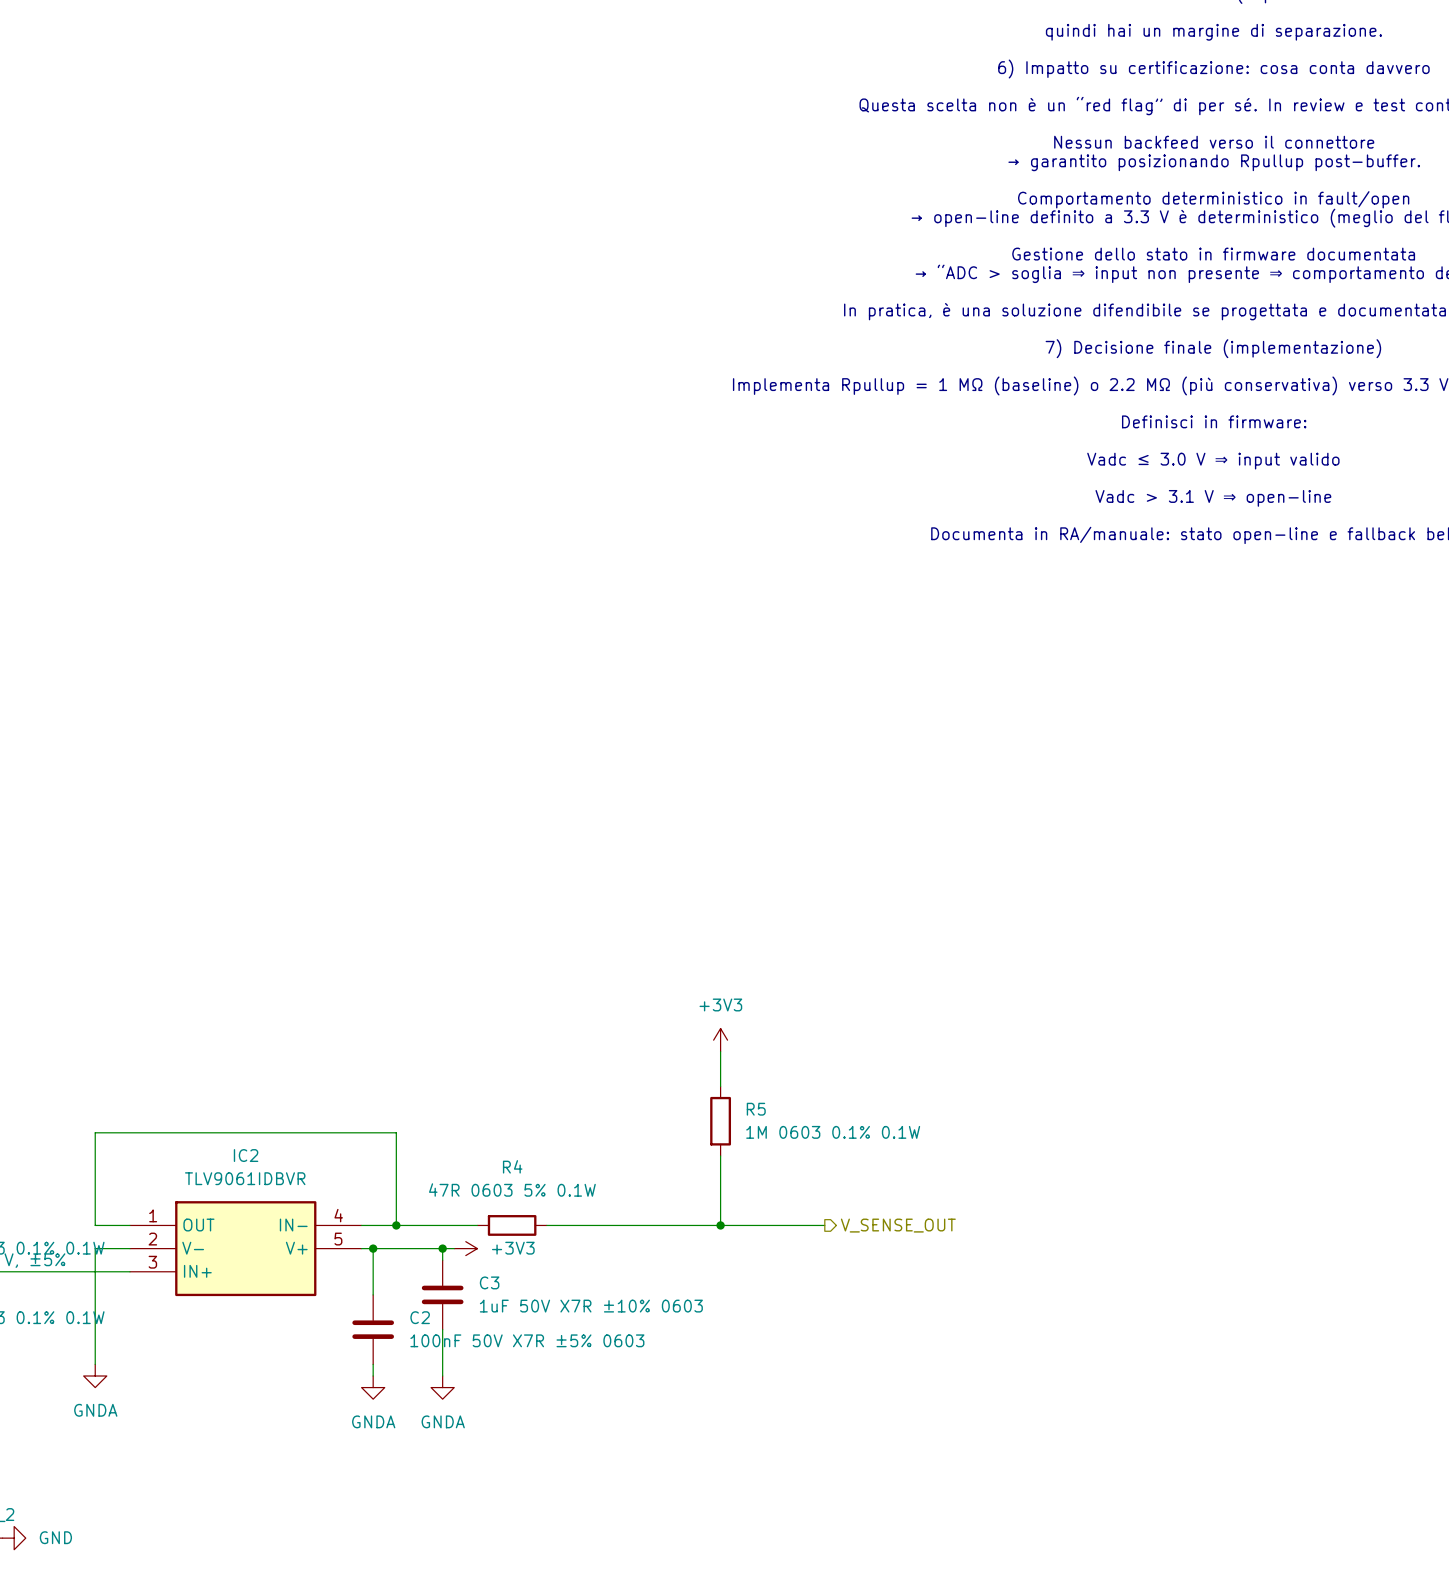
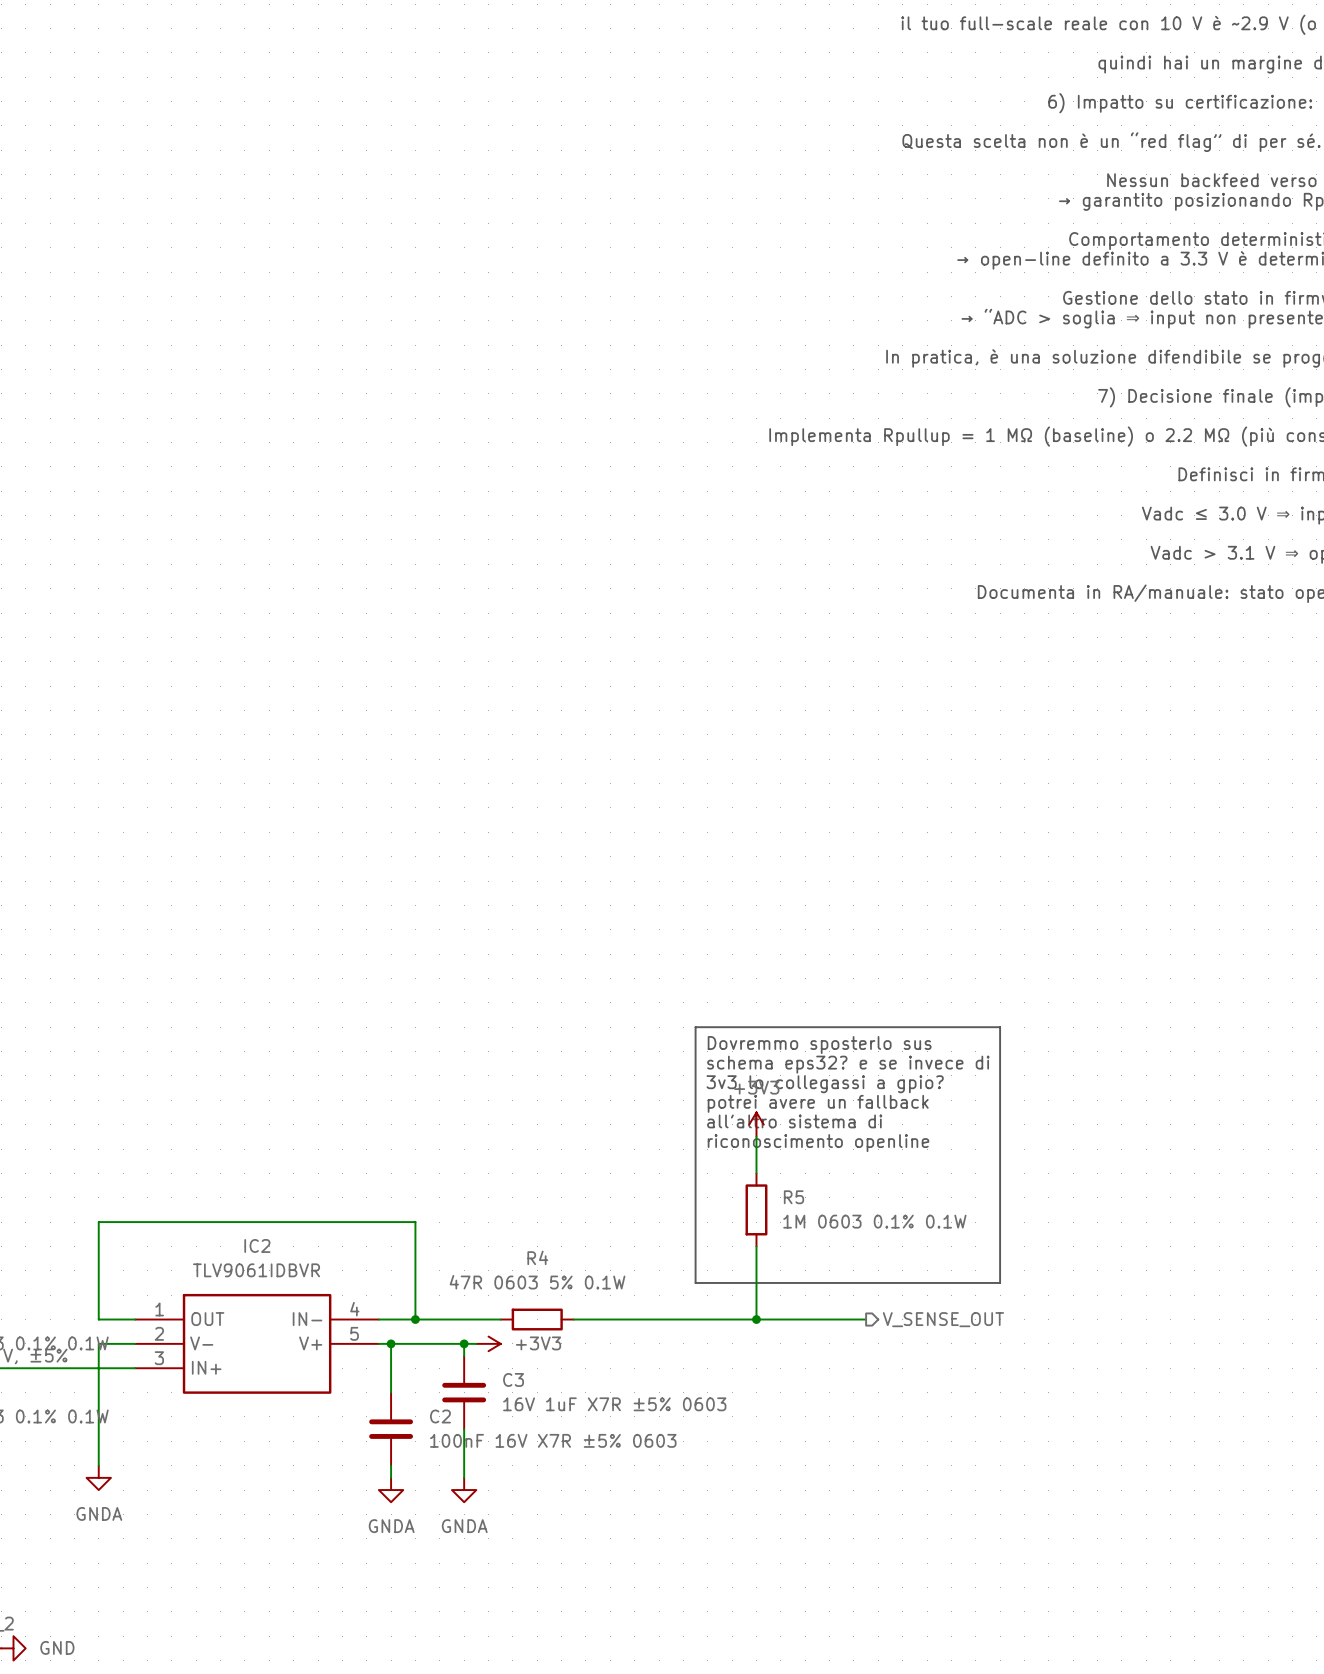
line: none -> (695, 1027) (1000, 1027) (1000, 1282) (695, 1282) (695, 1027)
text: none -> Dovremmo sposterlo sus (819, 1045)
text: none -> schema eps32? e se invece di (848, 1064)
text: none -> 3v3 lo collegassi a gpio? (825, 1084)
text: none -> potrei avere un fallback (818, 1103)
text: none -> all'altro sistema di (794, 1121)
text: none -> riconoscimento openline (818, 1143)
C3 value: 1uF 50V X7R ±10% 0603 (591, 1306) -> 16V 1uF X7R ±5% 0603 (614, 1404)
C2 value: 100nF 50V X7R ±5% 0603 (527, 1340) -> 100nF 16V X7R ±5% 0603 (553, 1440)

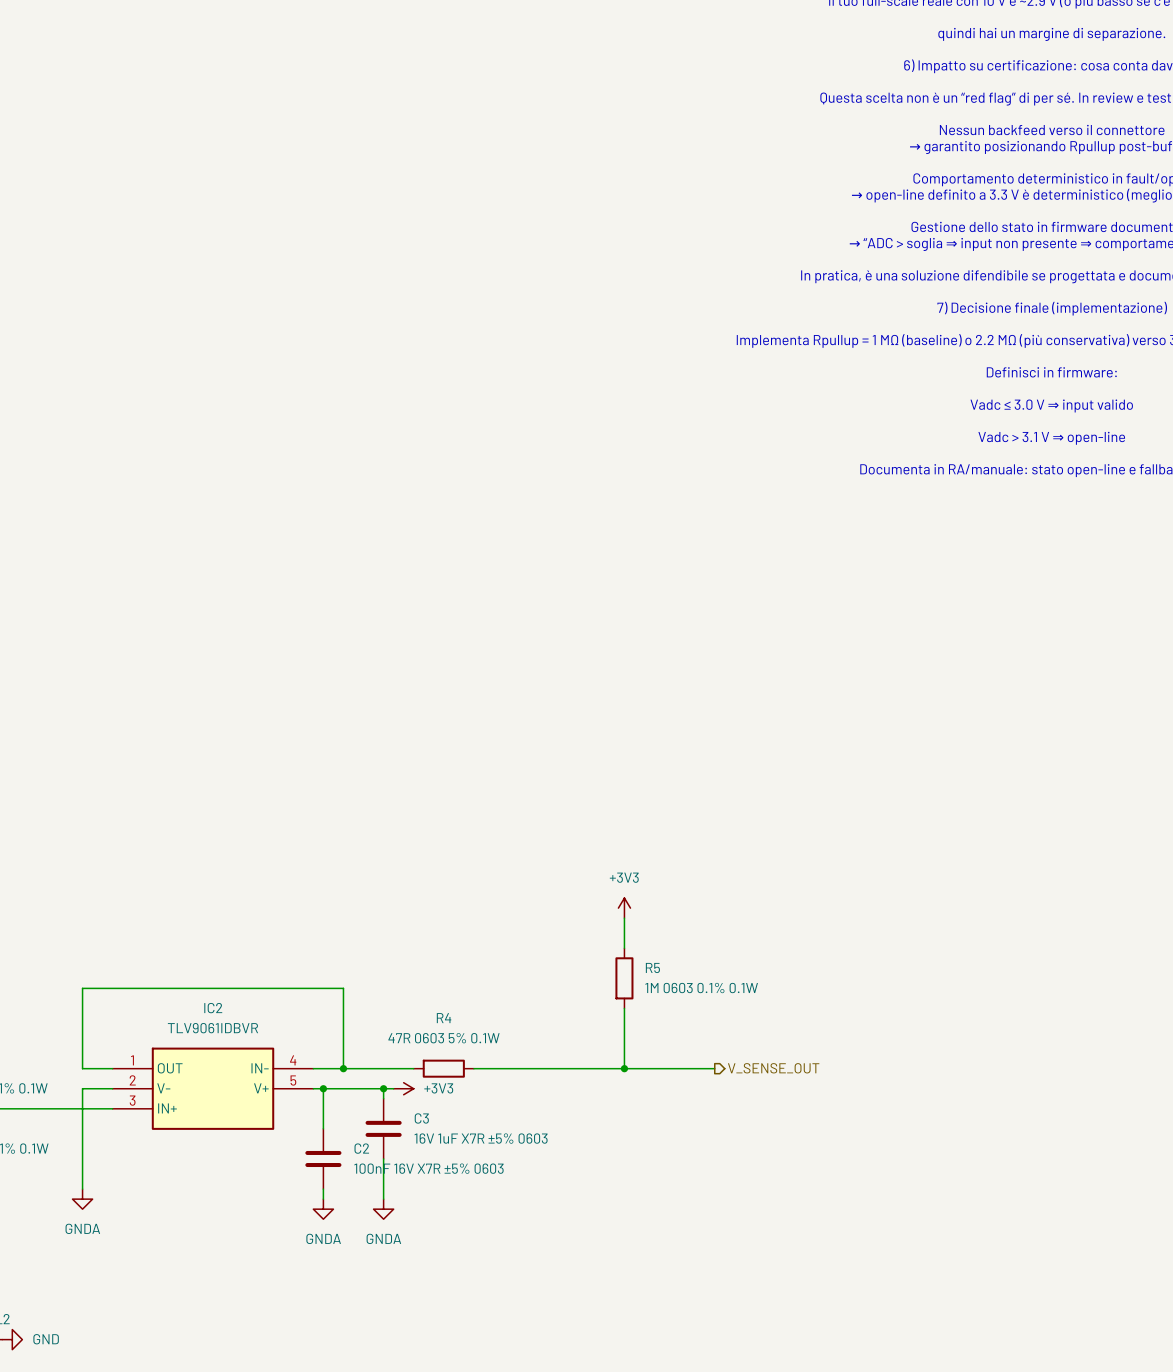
line: (695, 1027) (1000, 1027) (1000, 1282) (695, 1282) (695, 1027) -> none
text: Dovremmo sposterlo sus (819, 1045) -> none
text: schema eps32? e se invece di (848, 1064) -> none
text: 3v3 lo collegassi a gpio? (825, 1084) -> none
text: potrei avere un fallback (818, 1103) -> none
text: all'altro sistema di (794, 1121) -> none
text: riconoscimento openline (818, 1143) -> none

